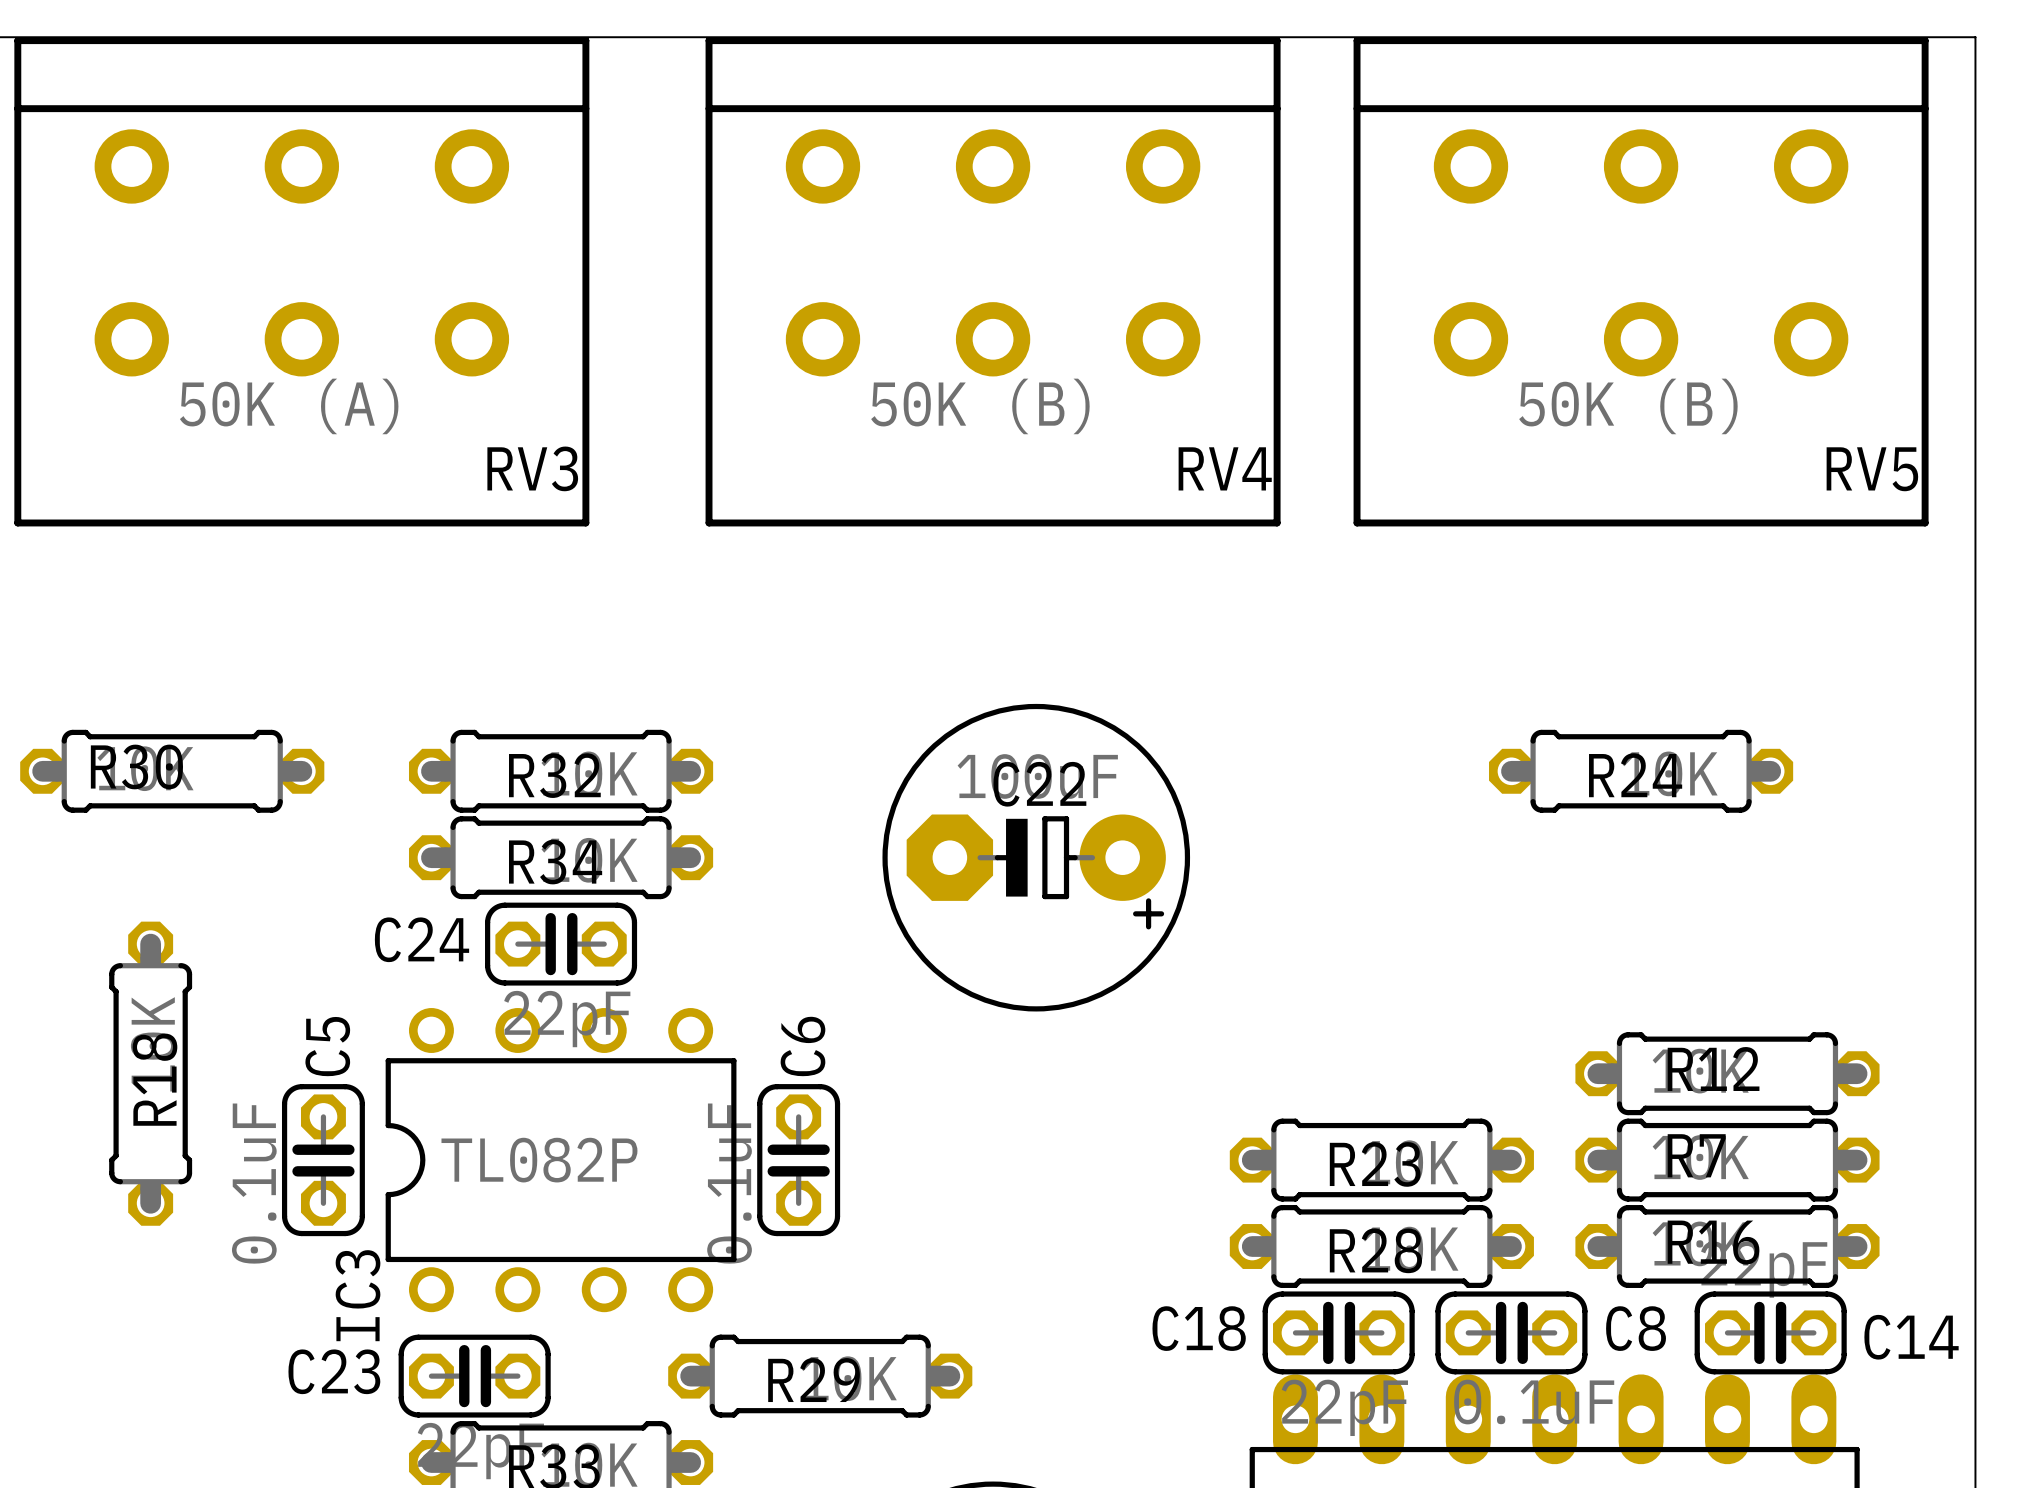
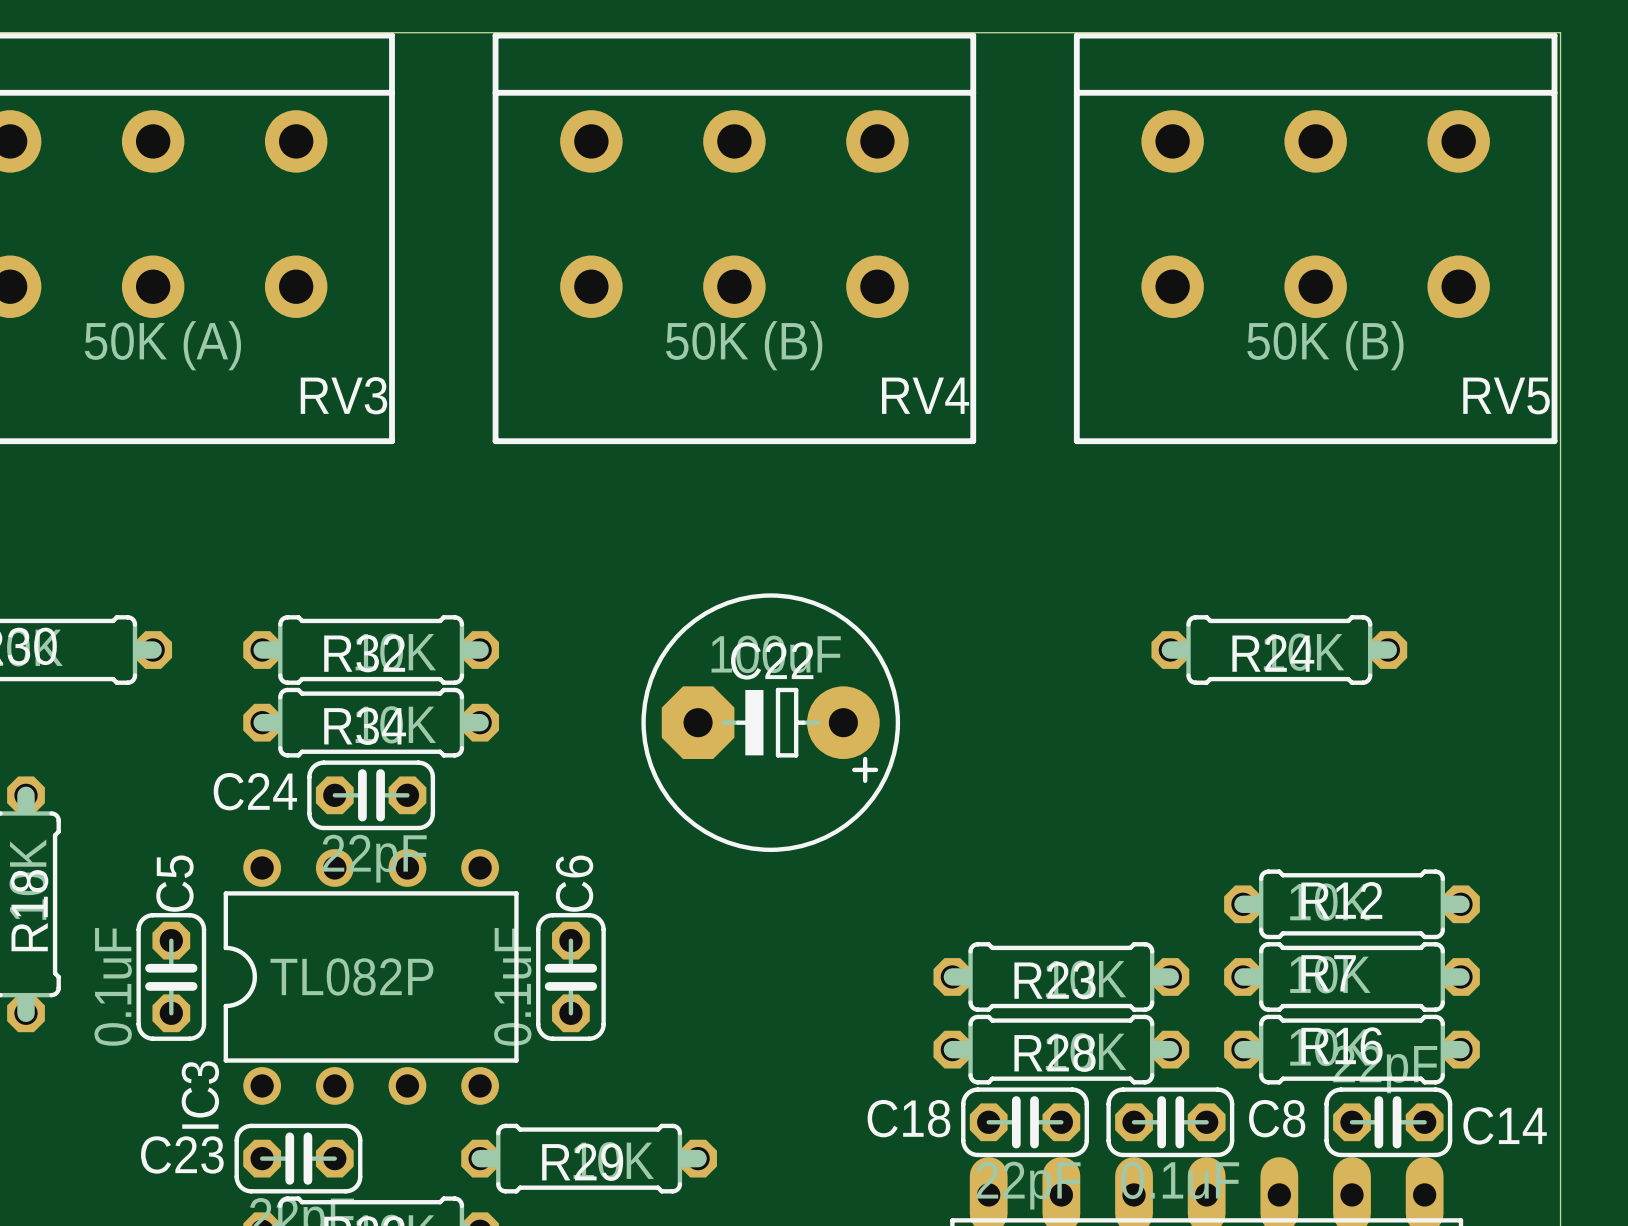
RV5 position: (1641, 281) -> (1315, 238)

